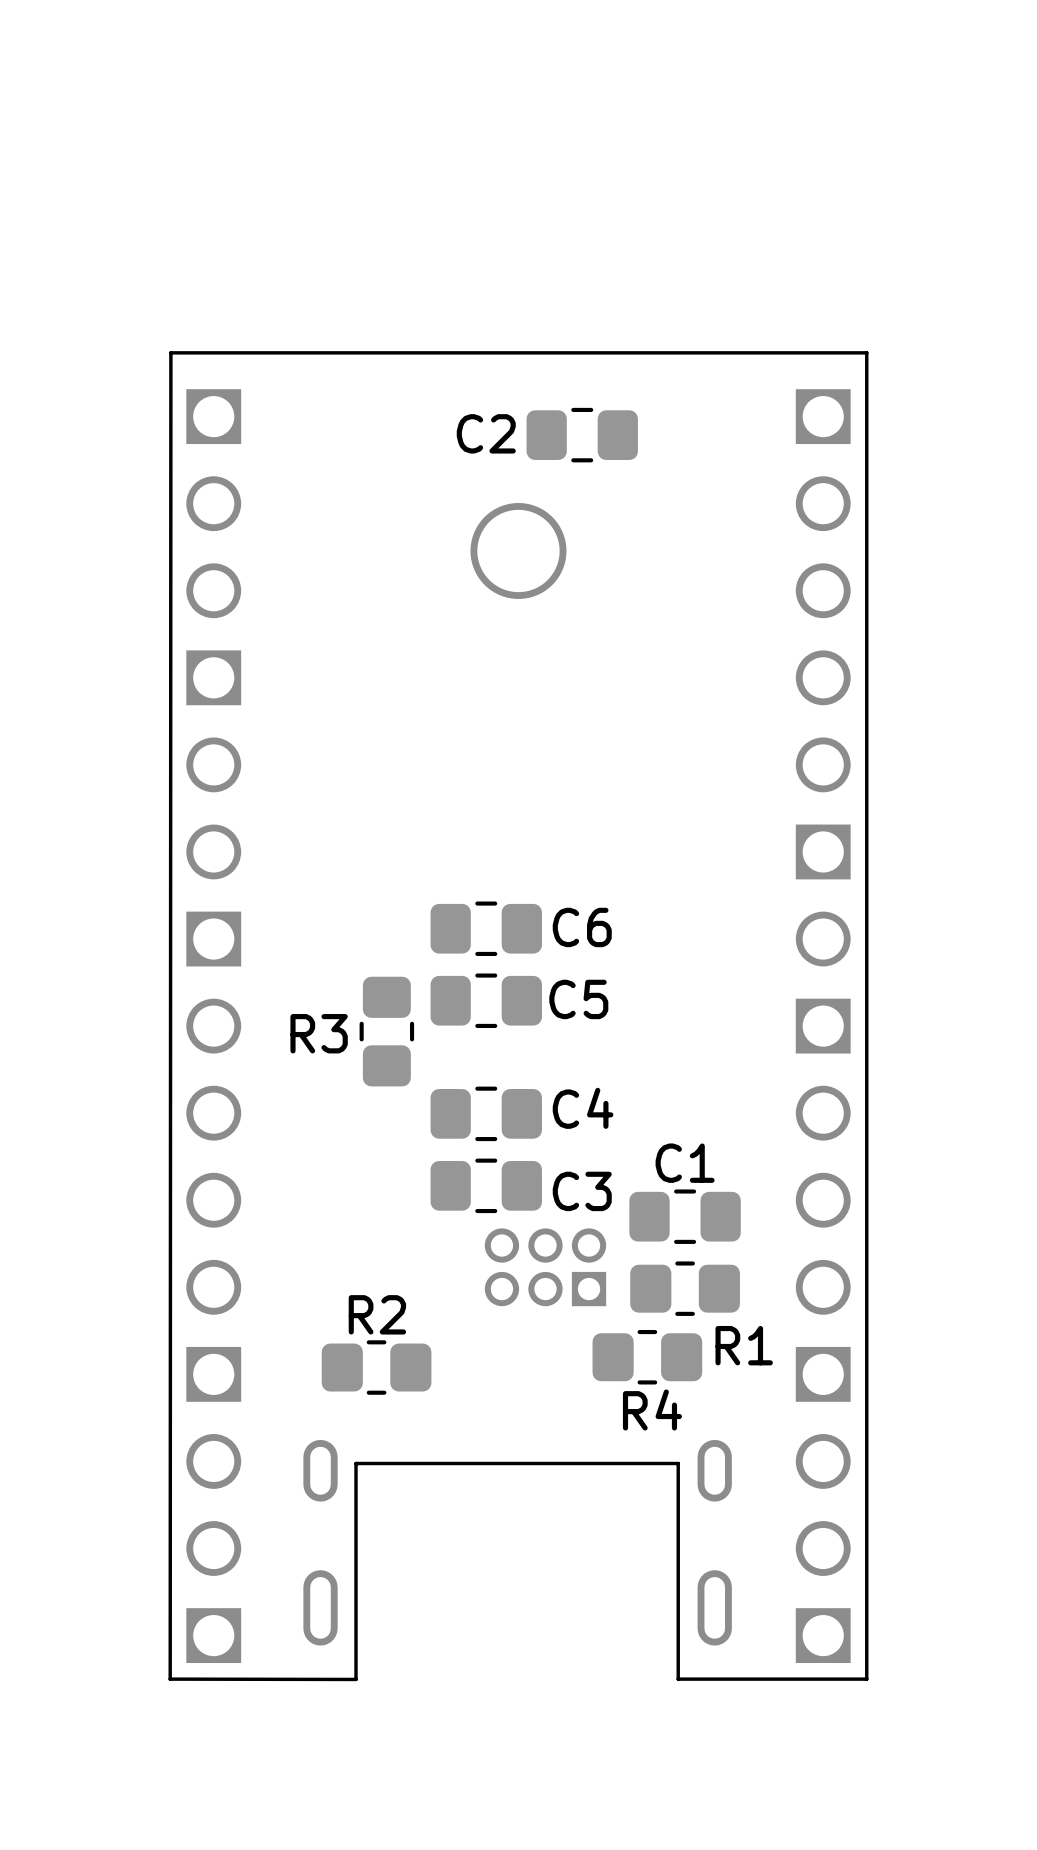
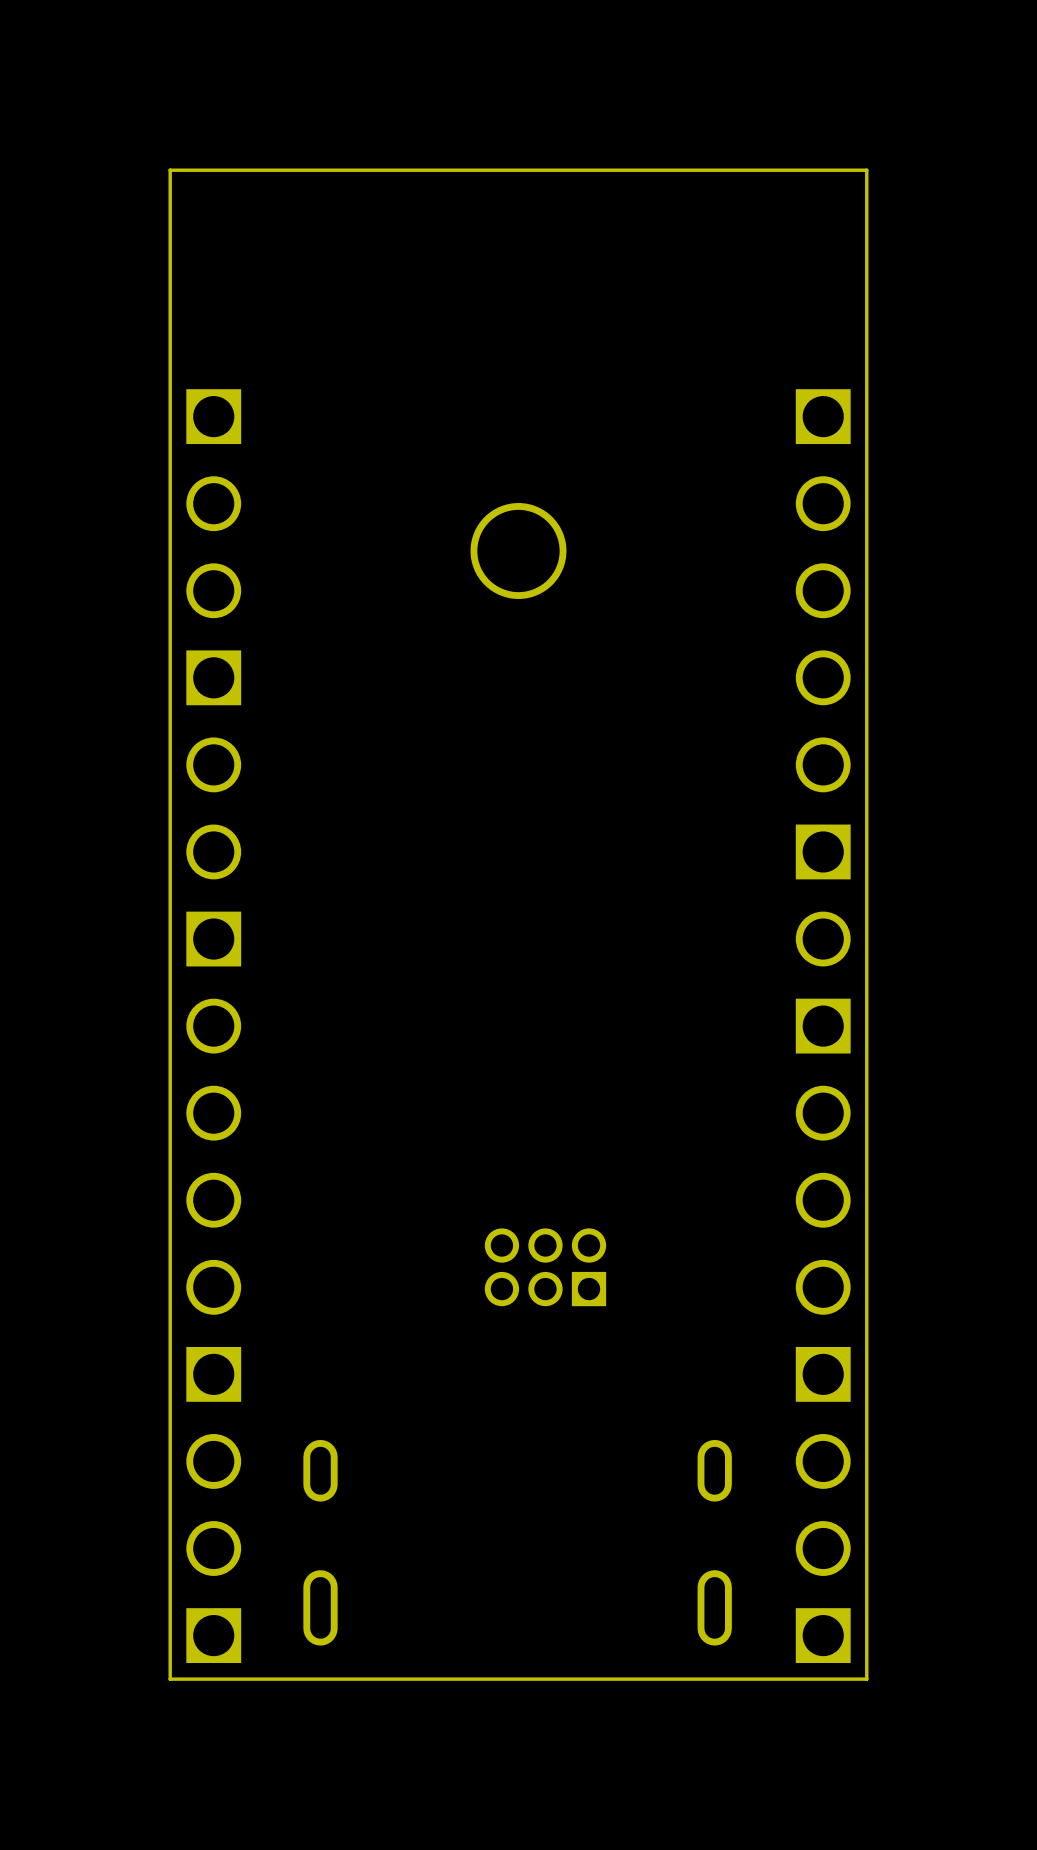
board edge: (866, 352) (170, 352) (170, 1679) (356, 1679) (356, 1463) (678, 1463) (678, 1679) -> (866, 352) (866, 170) (170, 170) (170, 1679) (678, 1679)
C2: (582, 435) -> none
C6: (486, 928) -> none
C5: (486, 1000) -> none
R3: (386, 1031) -> none
C4: (486, 1113) -> none
C3: (486, 1185) -> none
C1: (685, 1216) -> none
R1: (685, 1288) -> none
R4: (647, 1357) -> none
R2: (376, 1367) -> none

